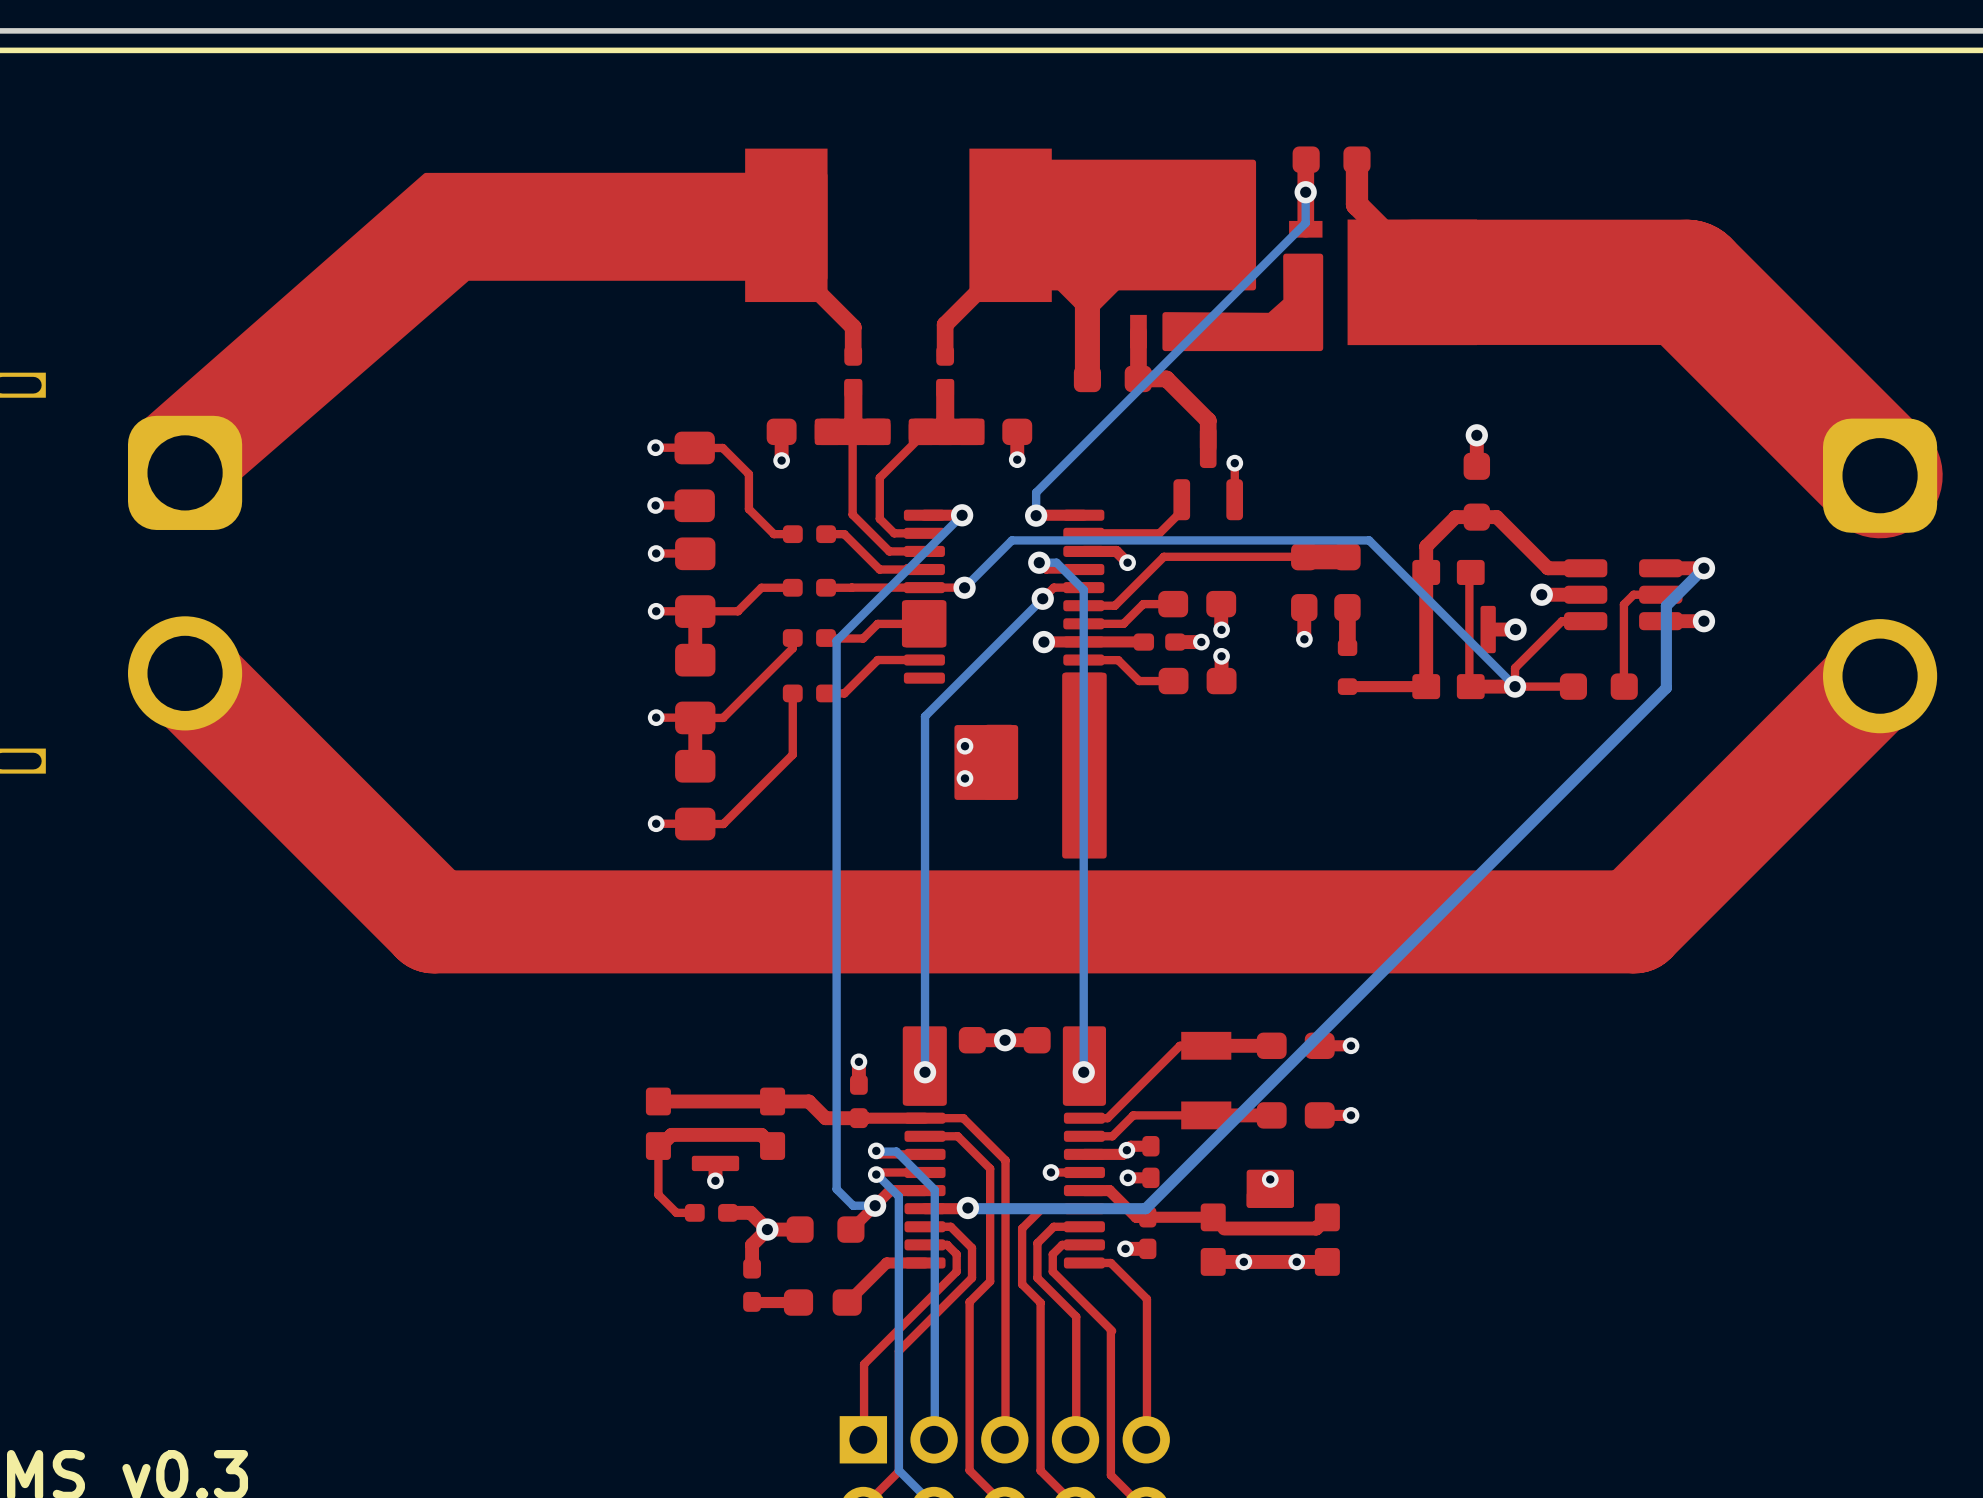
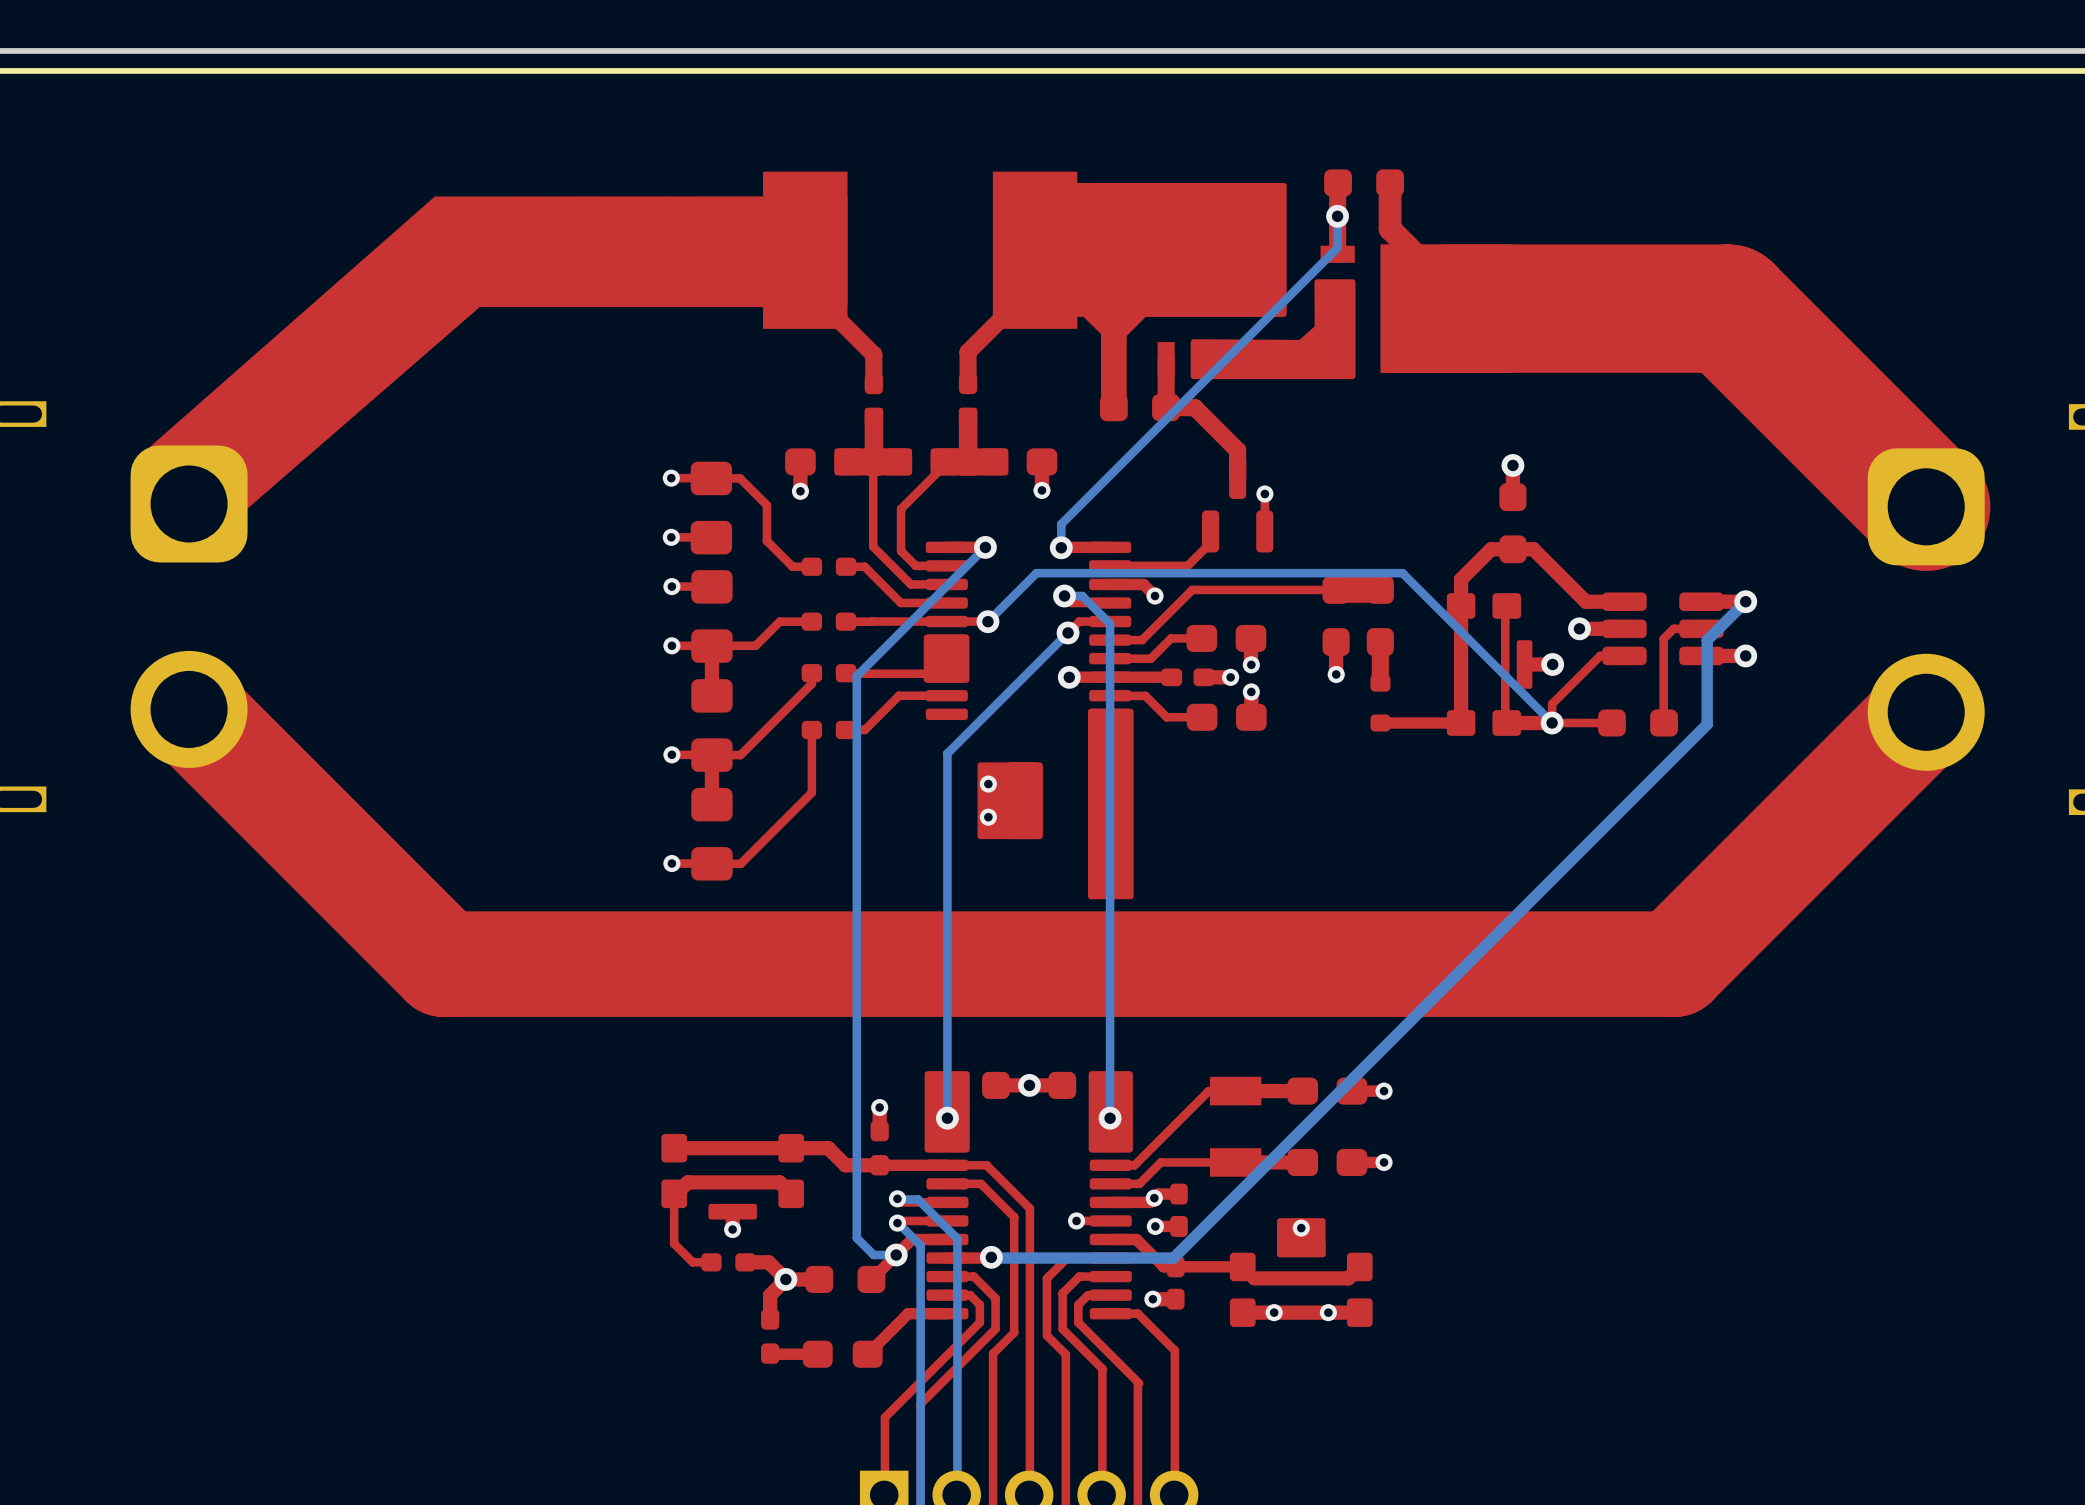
top track: (924, 623) (877, 623) (863, 638) (836, 638) -> (946, 677) (943, 673) (856, 673)

